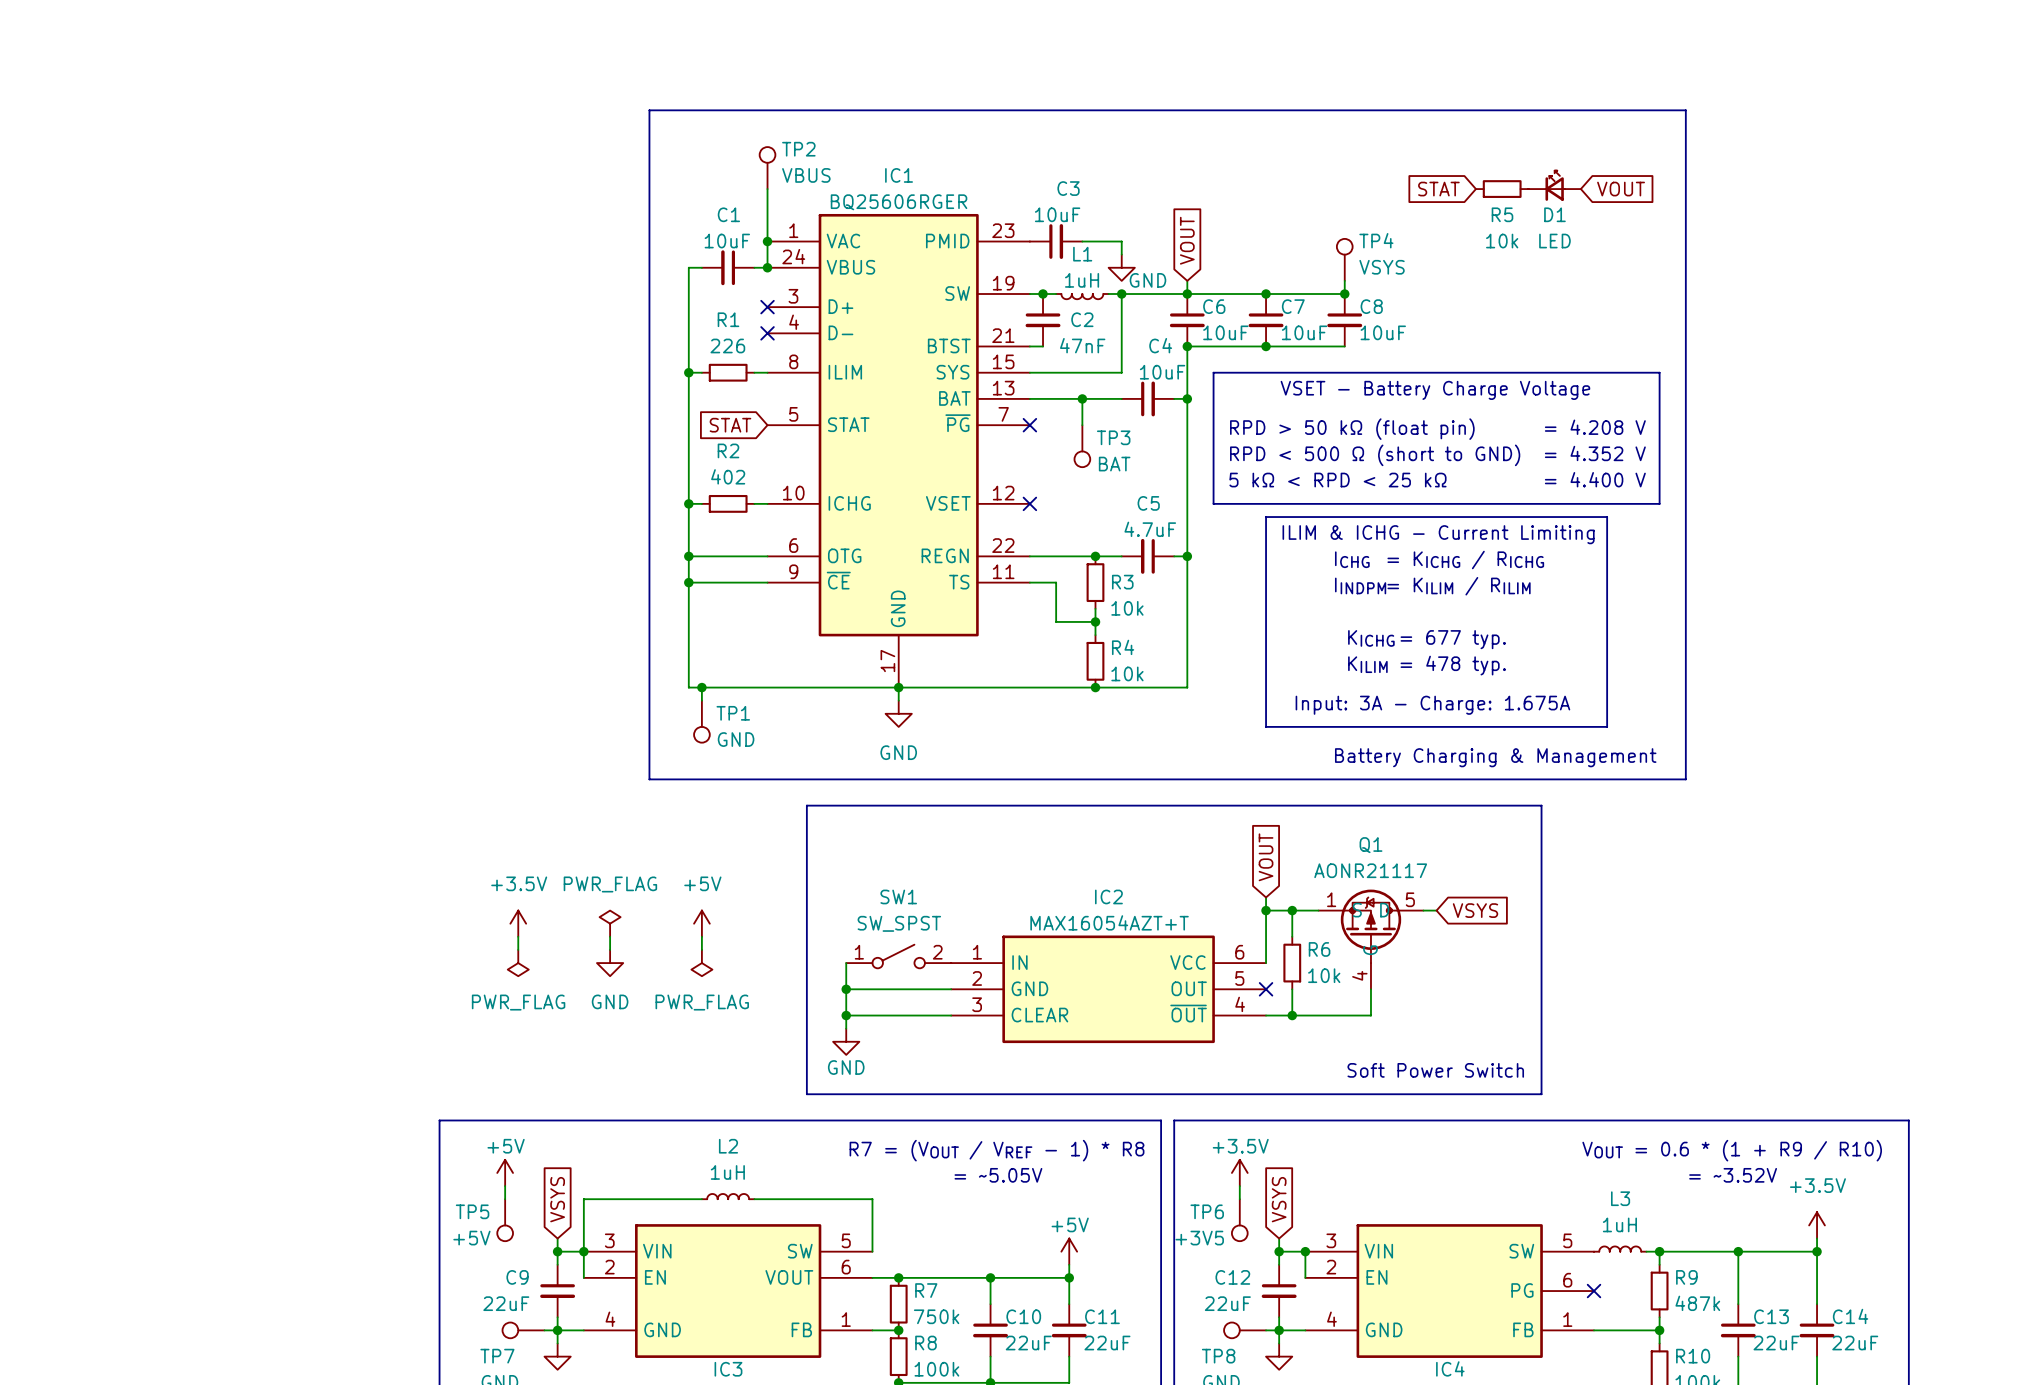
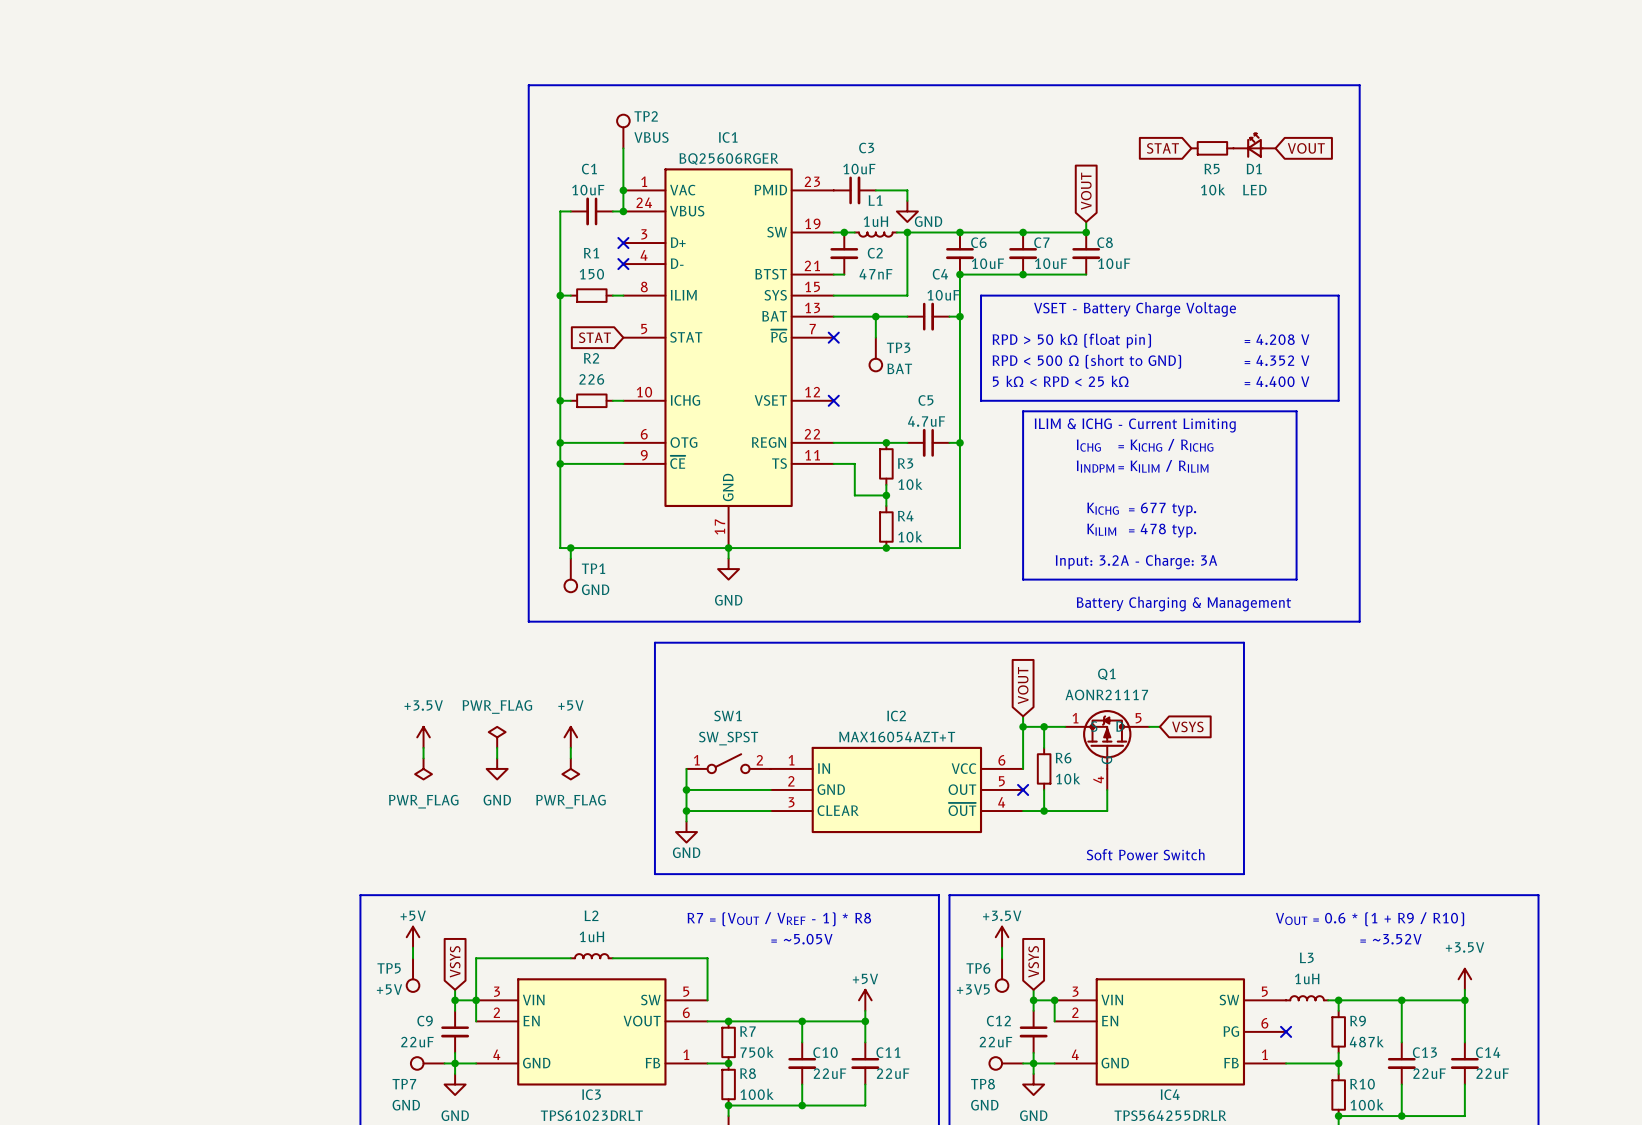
global label position: VOUT (1187, 240) -> VOUT (1086, 191)
TP4: VSYS (1344, 259) -> none
wire: (1187, 280) (1187, 294) -> none
R1 value: 226 (727, 345) -> 150 (591, 274)
R2 value: 402 (728, 476) -> 226 (591, 379)
text: Input: 3A - Charge: 1.675A (1432, 705) -> Input: 3.2A - Charge: 3A (1136, 561)

